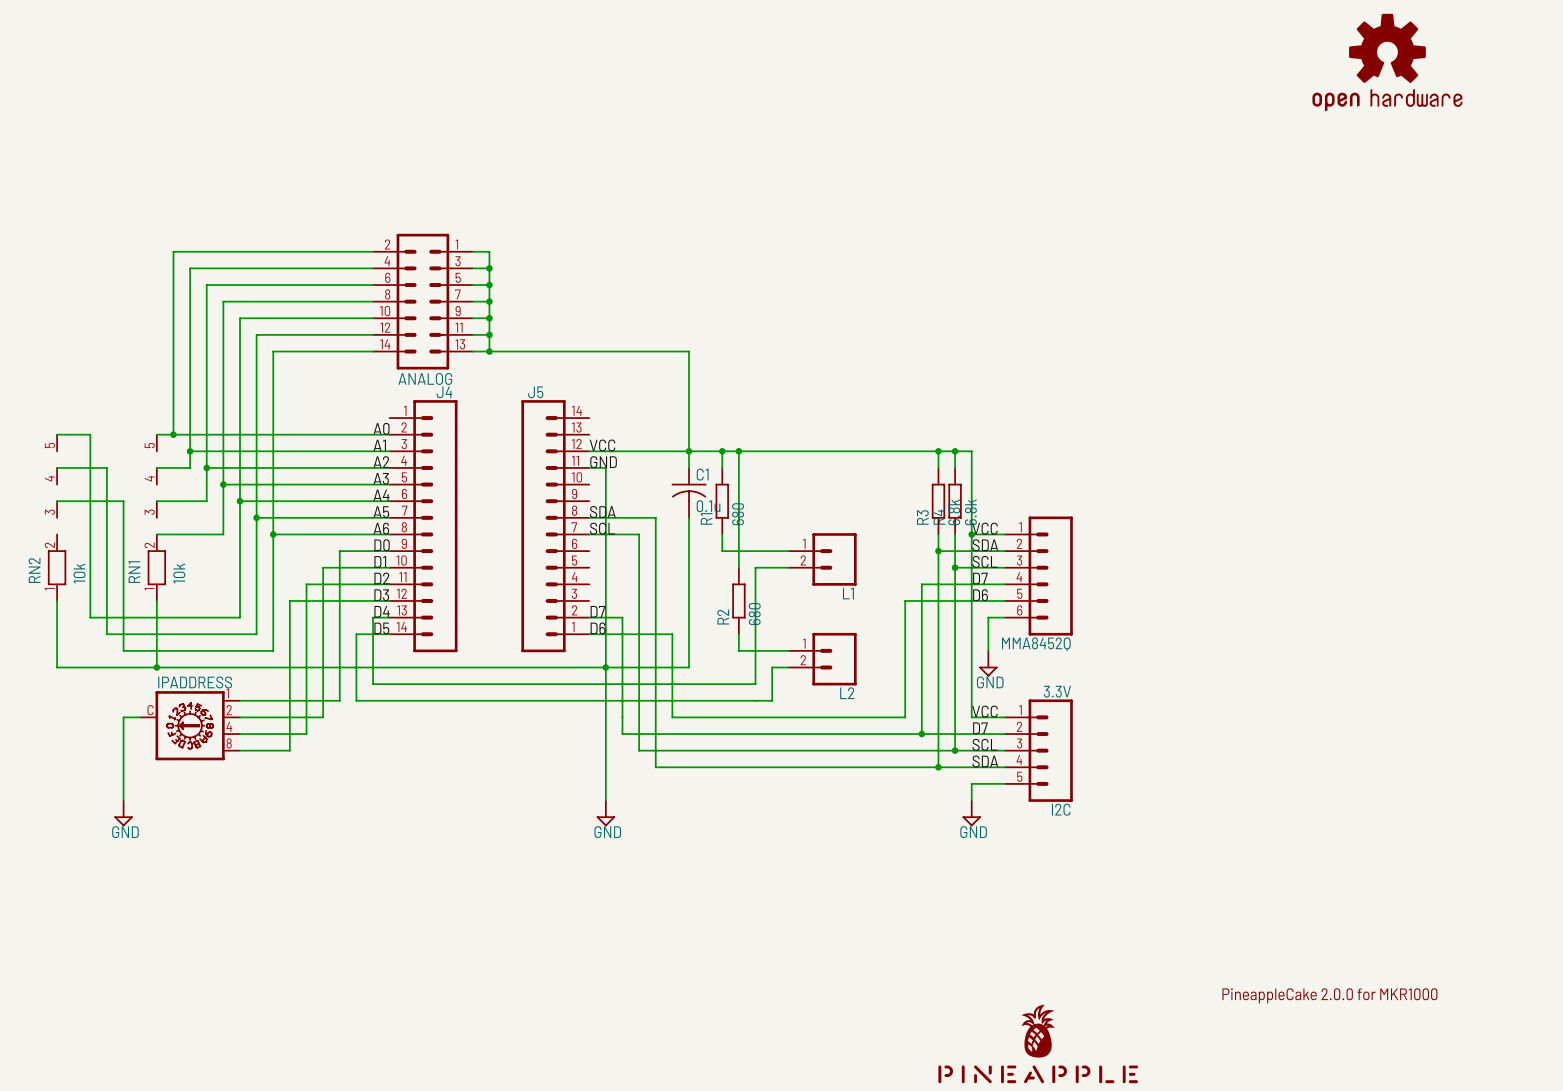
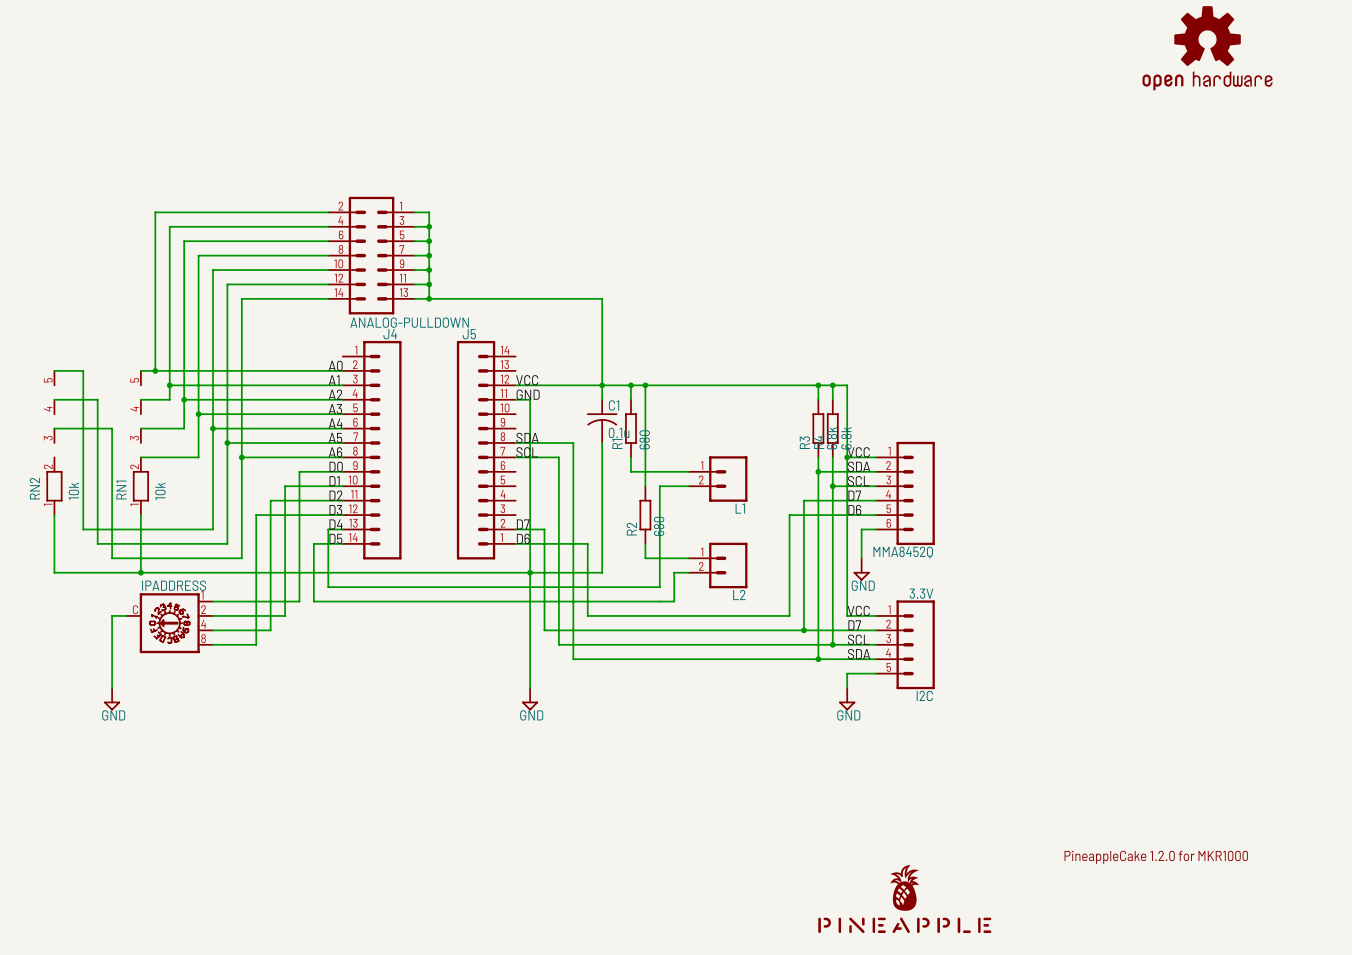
ANALOG name: ANALOG (425, 378) -> ANALOG-PULLDOWN (409, 322)
text: PineappleCake 2.0.0 for MKR1000 (1329, 995) -> PineappleCake 1.2.0 for MKR1000 (1156, 857)

